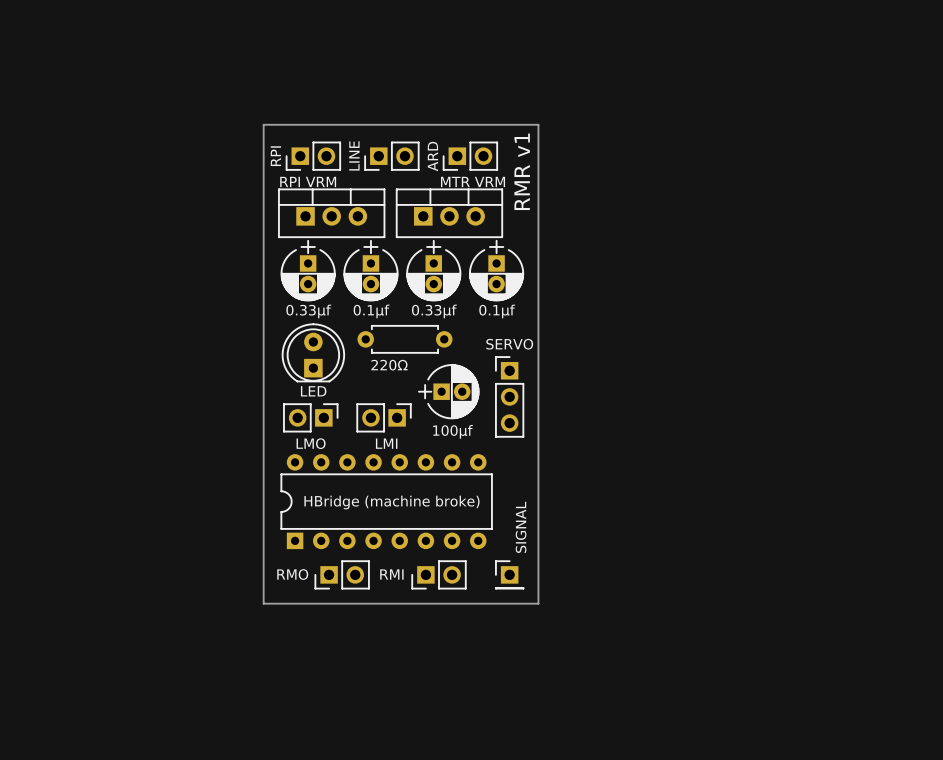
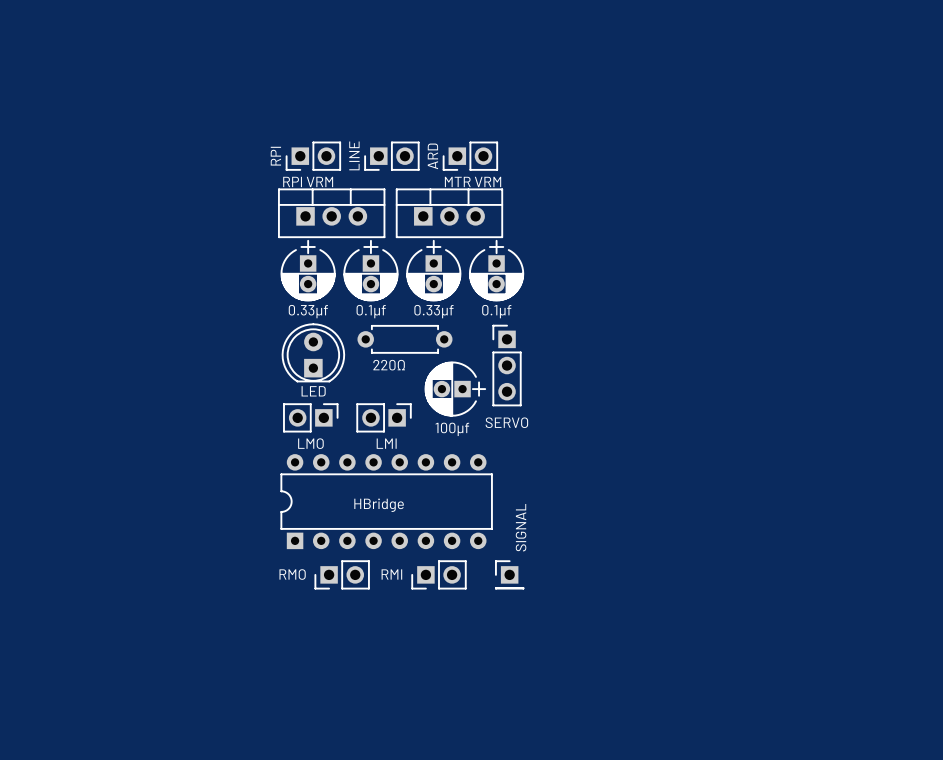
board edge: (263, 124) (263, 603) (538, 603) (538, 124) (263, 124) -> none
text: RMR v1 (522, 171) -> none
SERVO name position: SERVO (509, 344) -> SERVO (506, 422)
100μf rotation: 0° (448, 391) -> 180° (455, 389)
SERVO position: (509, 396) -> (507, 365)
HBridge (machine broke) name: HBridge (machine broke) (391, 502) -> HBridge (379, 505)

